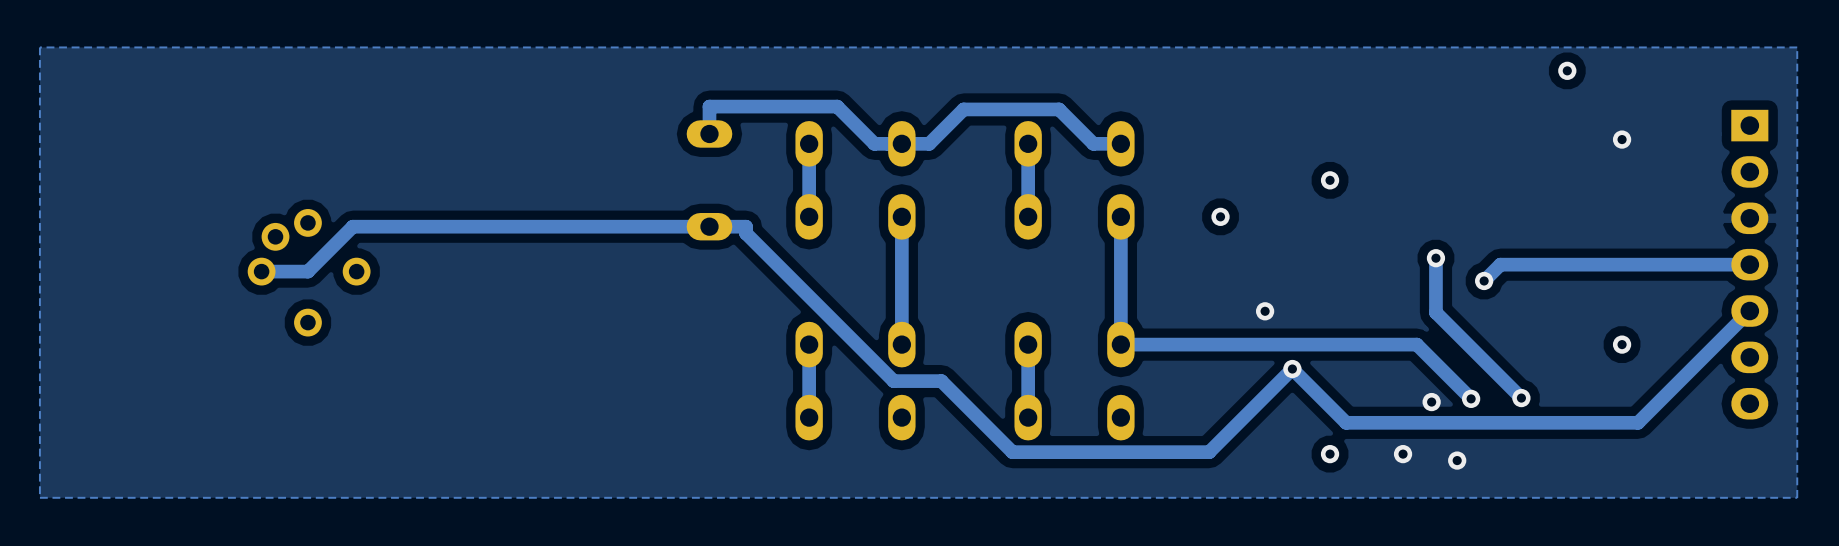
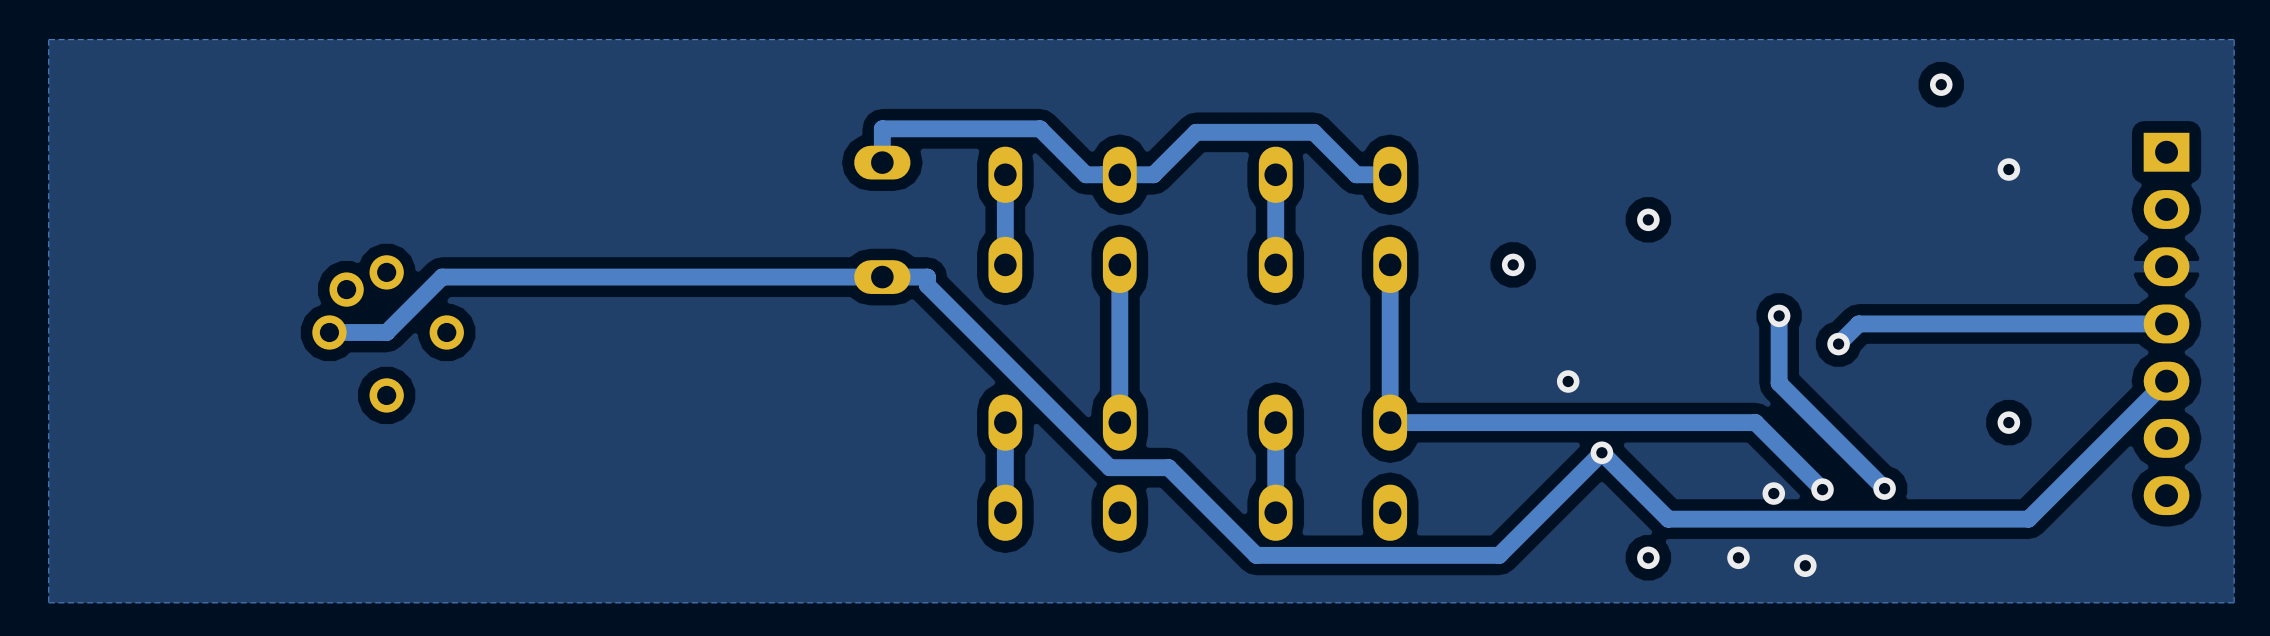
zone outline: (1797, 47) (1797, 497) (39, 497) (39, 47) (1797, 47) -> (2234, 39) (2234, 602) (48, 602) (48, 39) (2234, 39)

